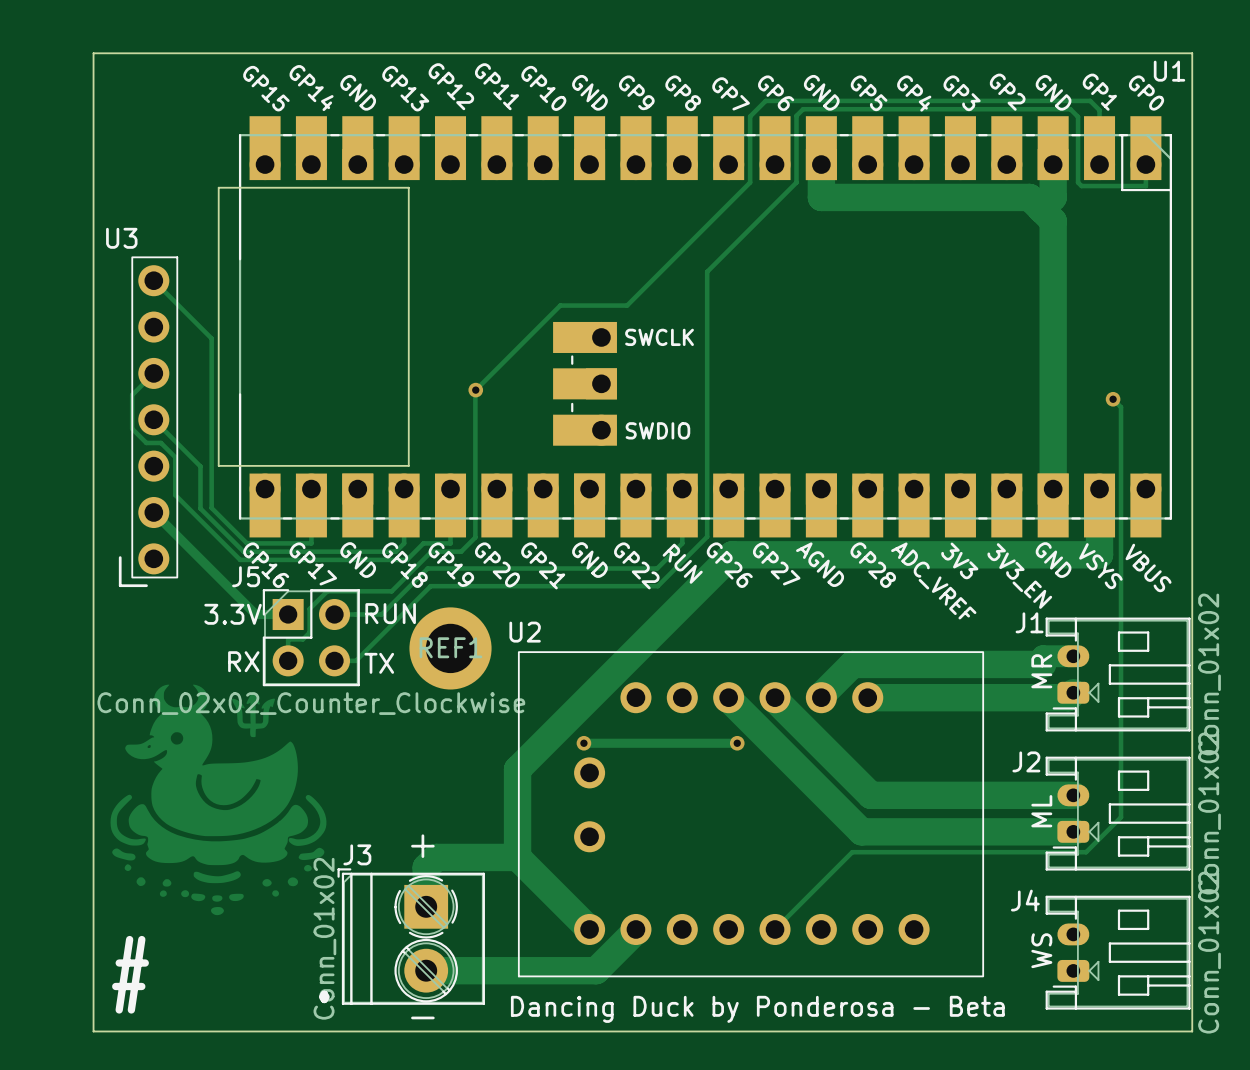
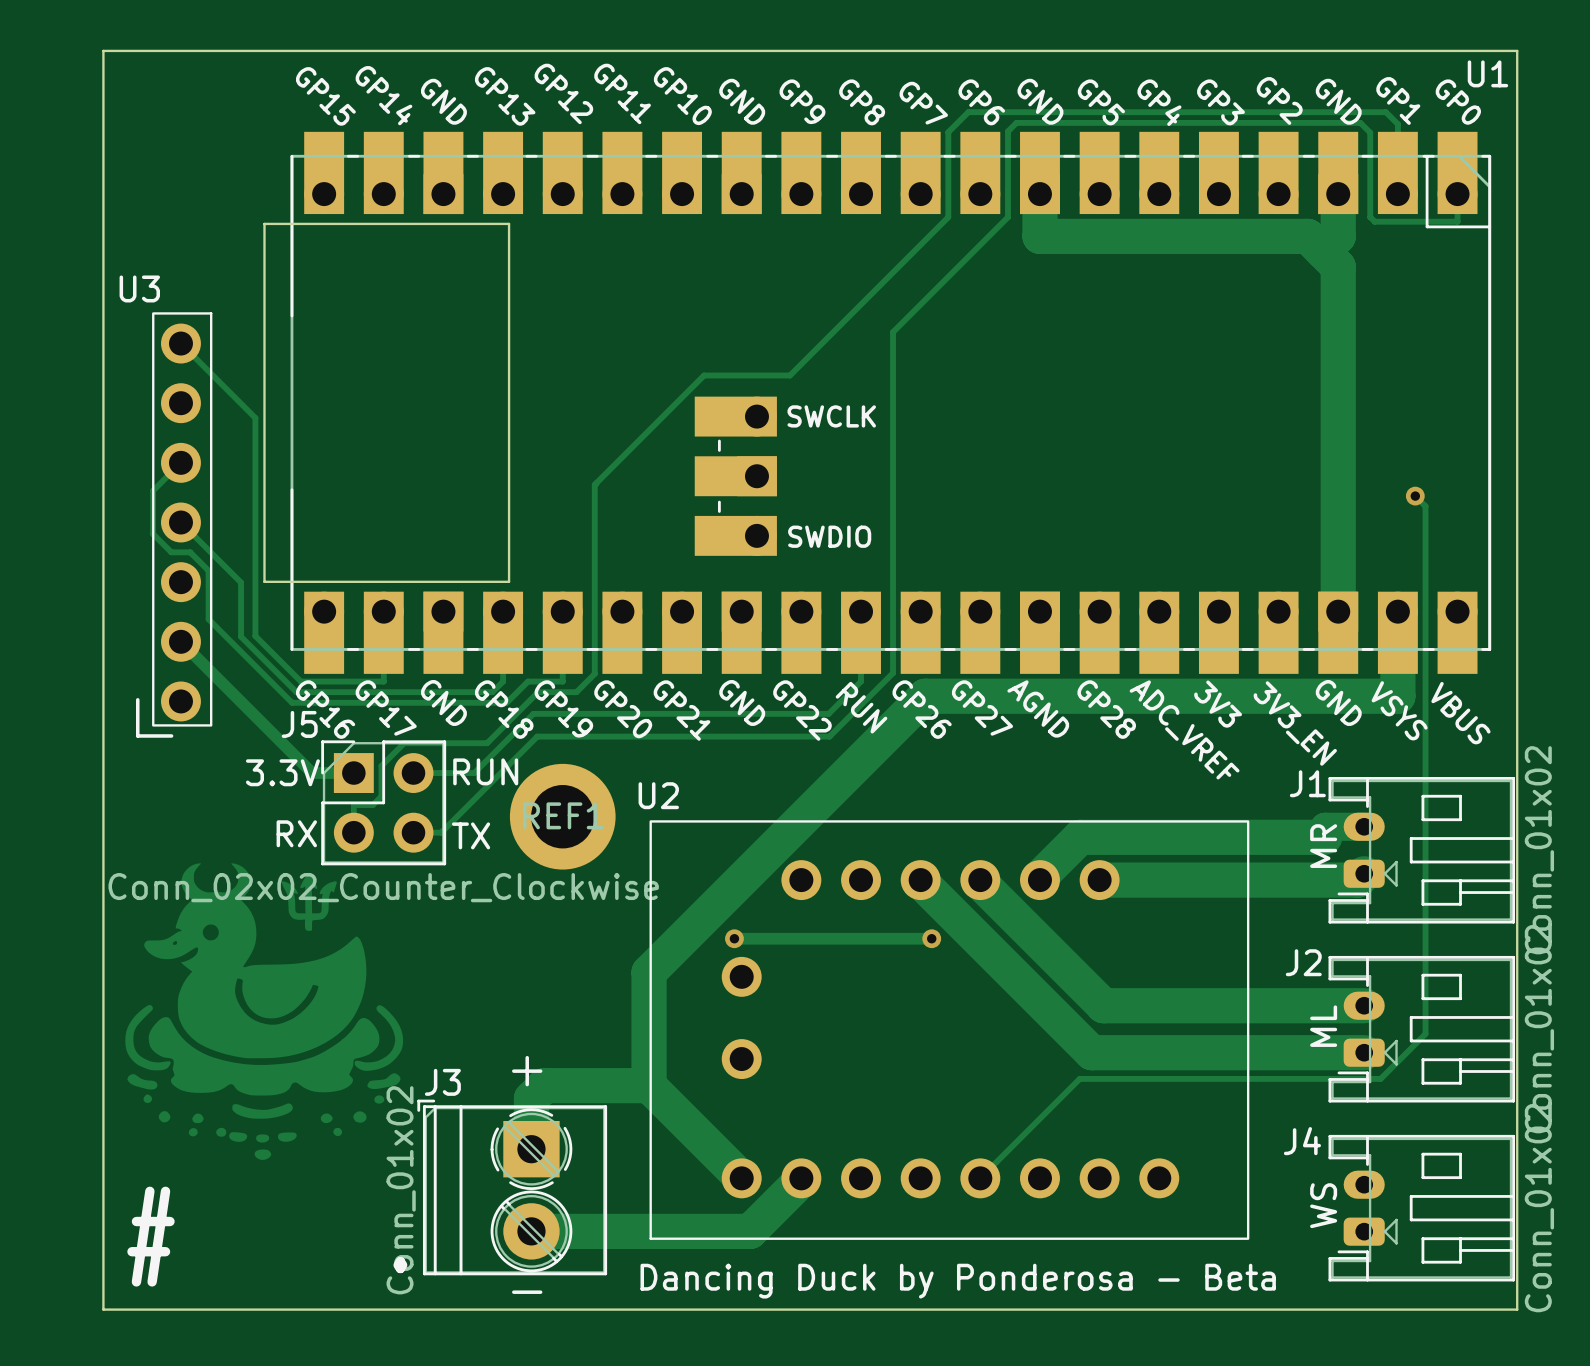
via: (475, 390) -> none

